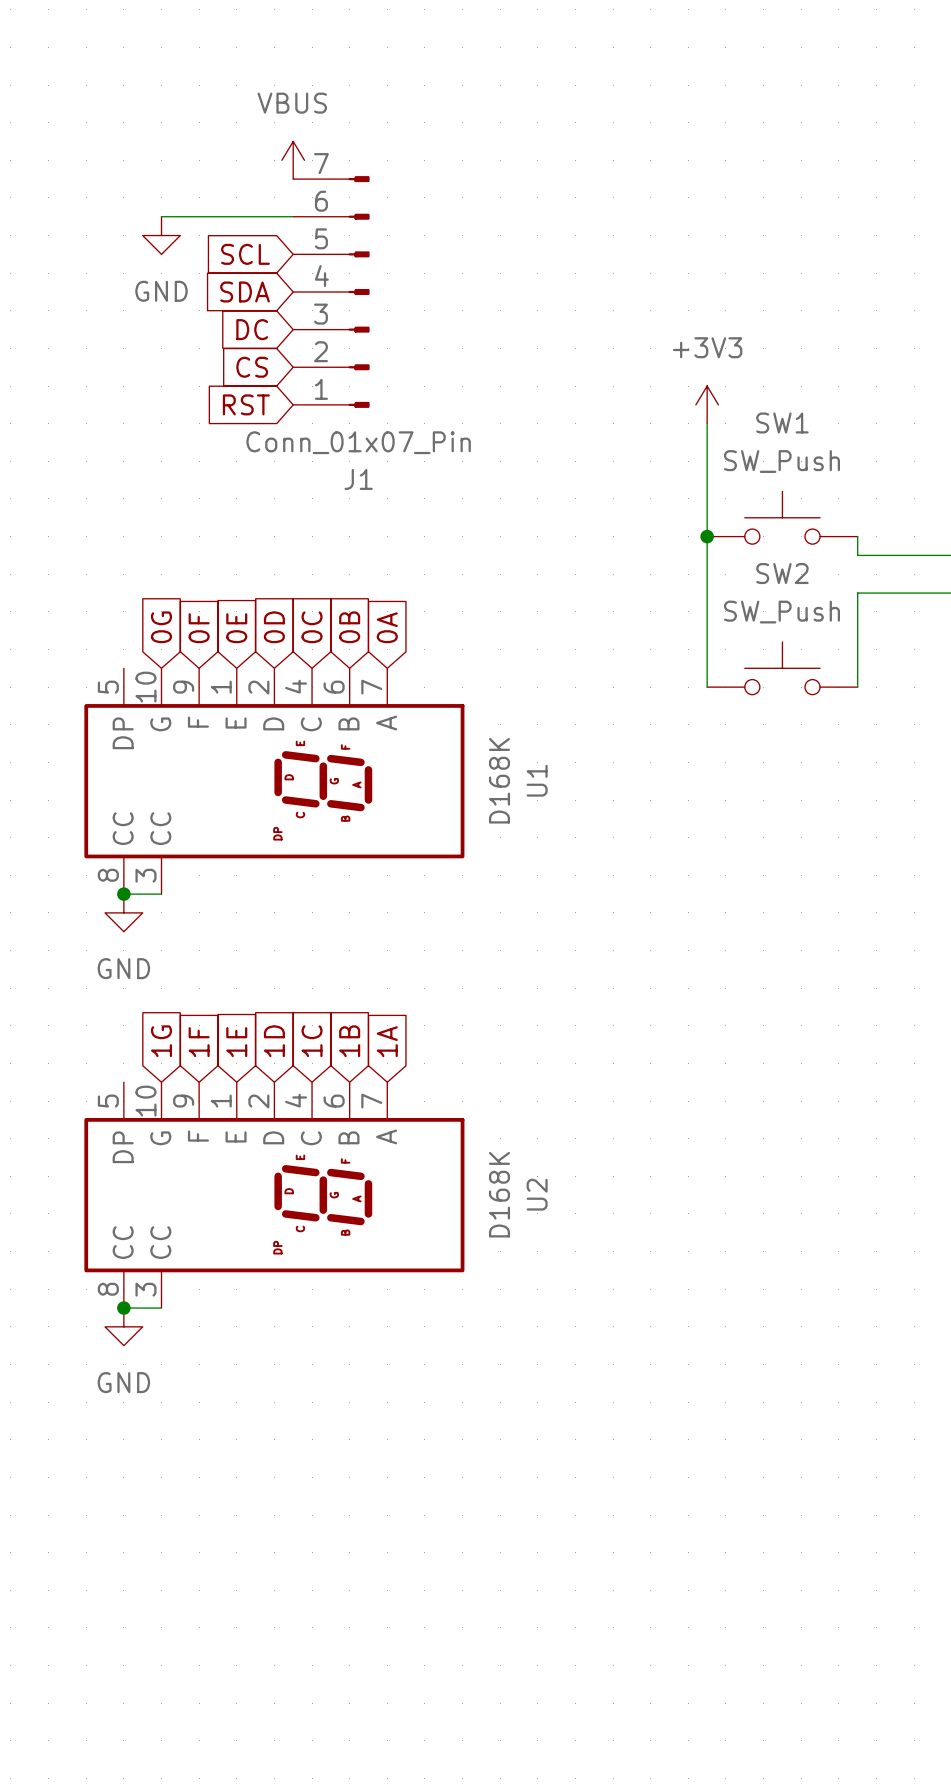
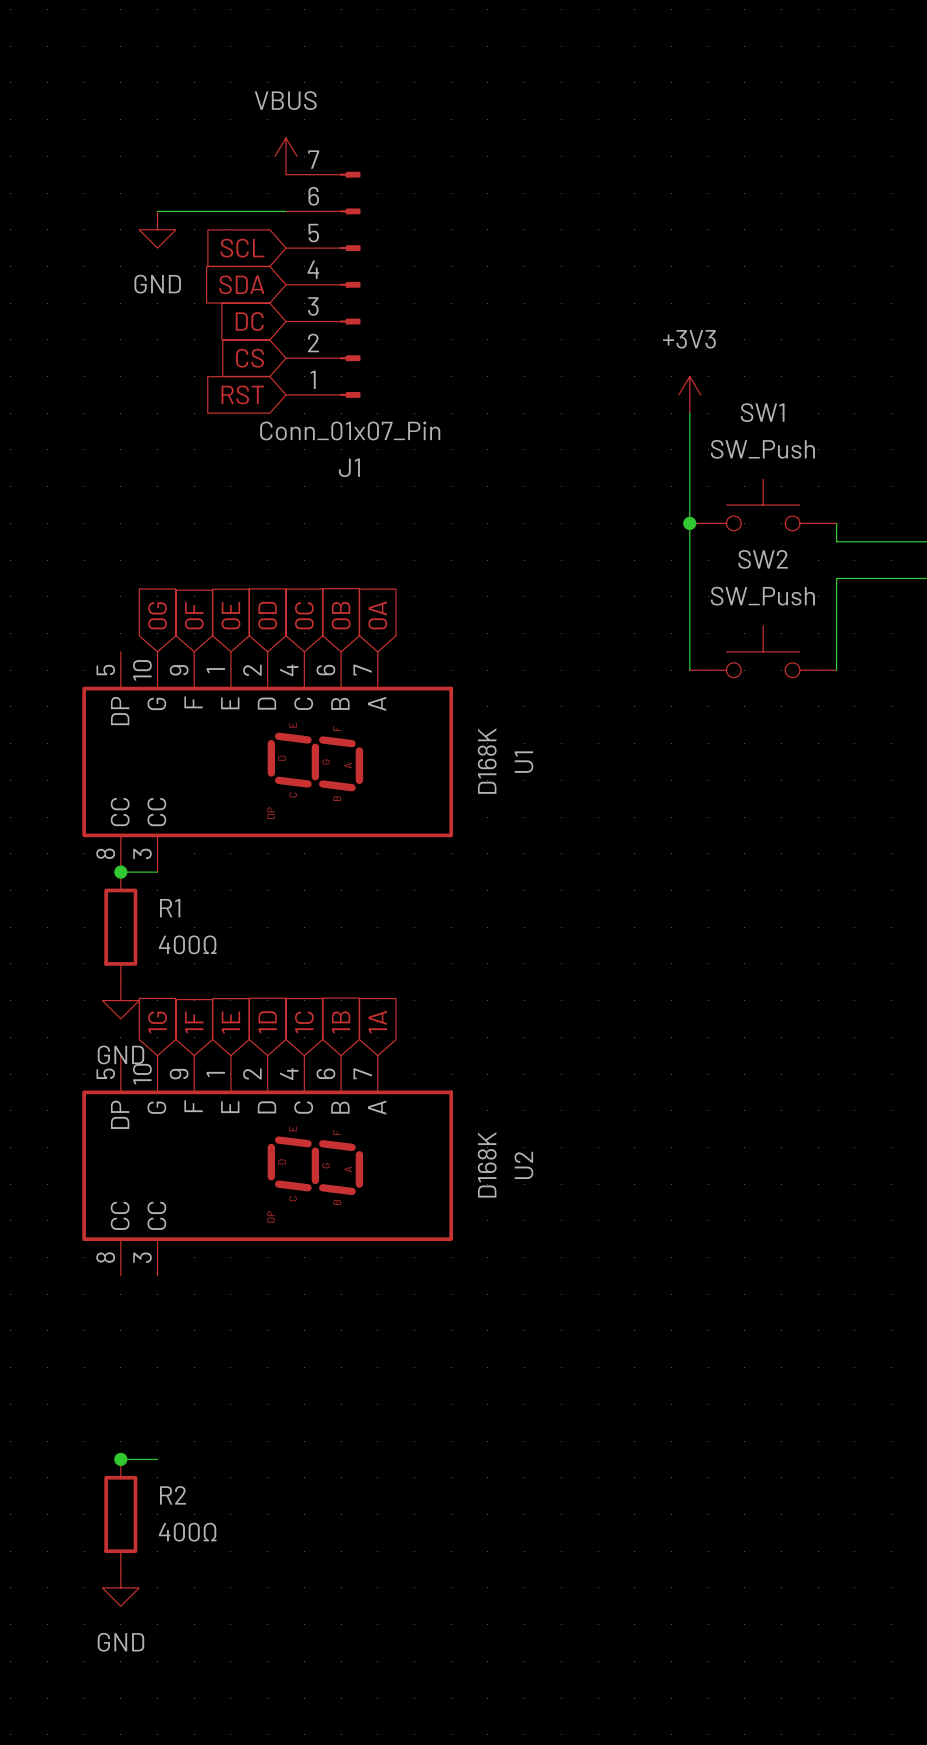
power symbol position: GND (123, 912) -> GND (120, 1000)
R1: none -> 400Ω (120, 927)
wire: (123, 1308) (161, 1308) -> (120, 1459) (157, 1459)
junction: (123, 1308) -> none
power symbol: GND (123, 1326) -> none
junction: none -> (120, 1459)
R2: none -> 400Ω (120, 1514)
power symbol: none -> GND (120, 1587)

